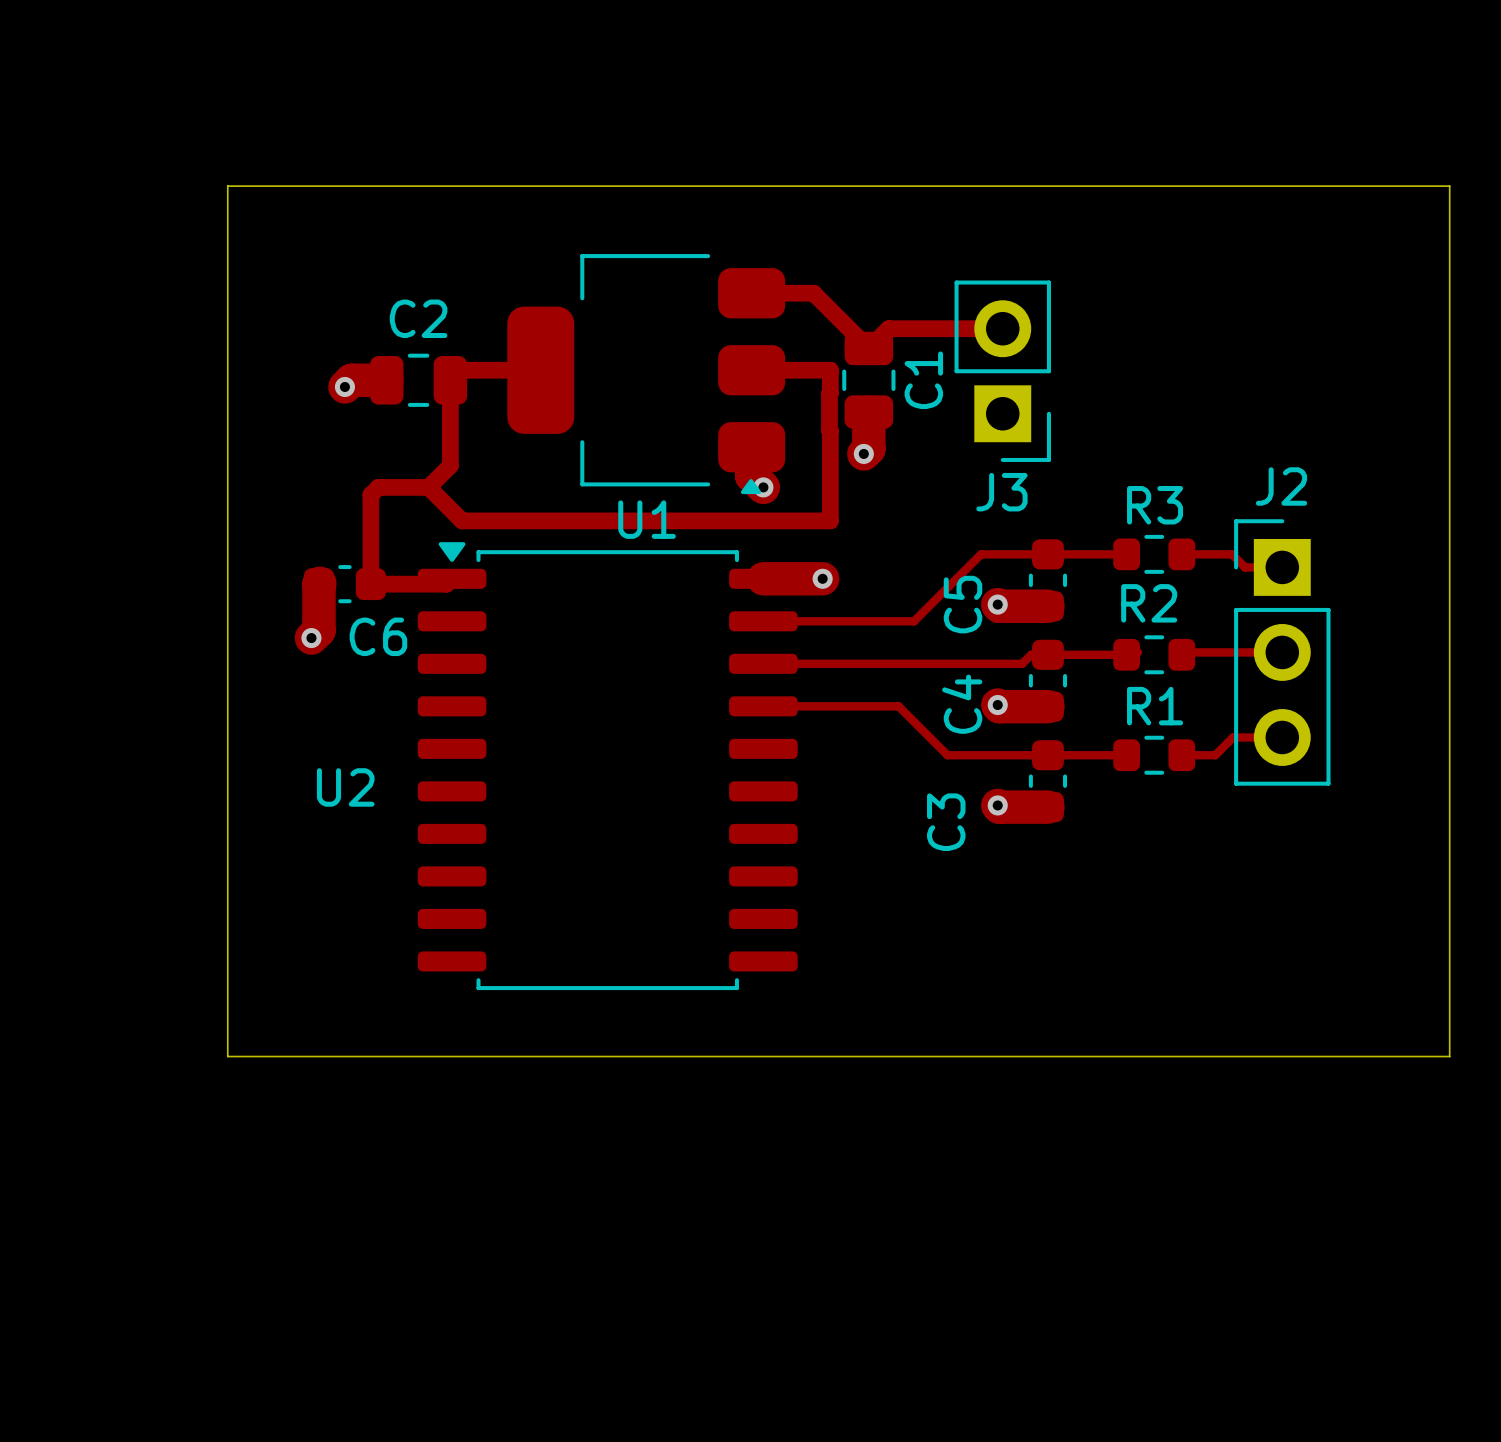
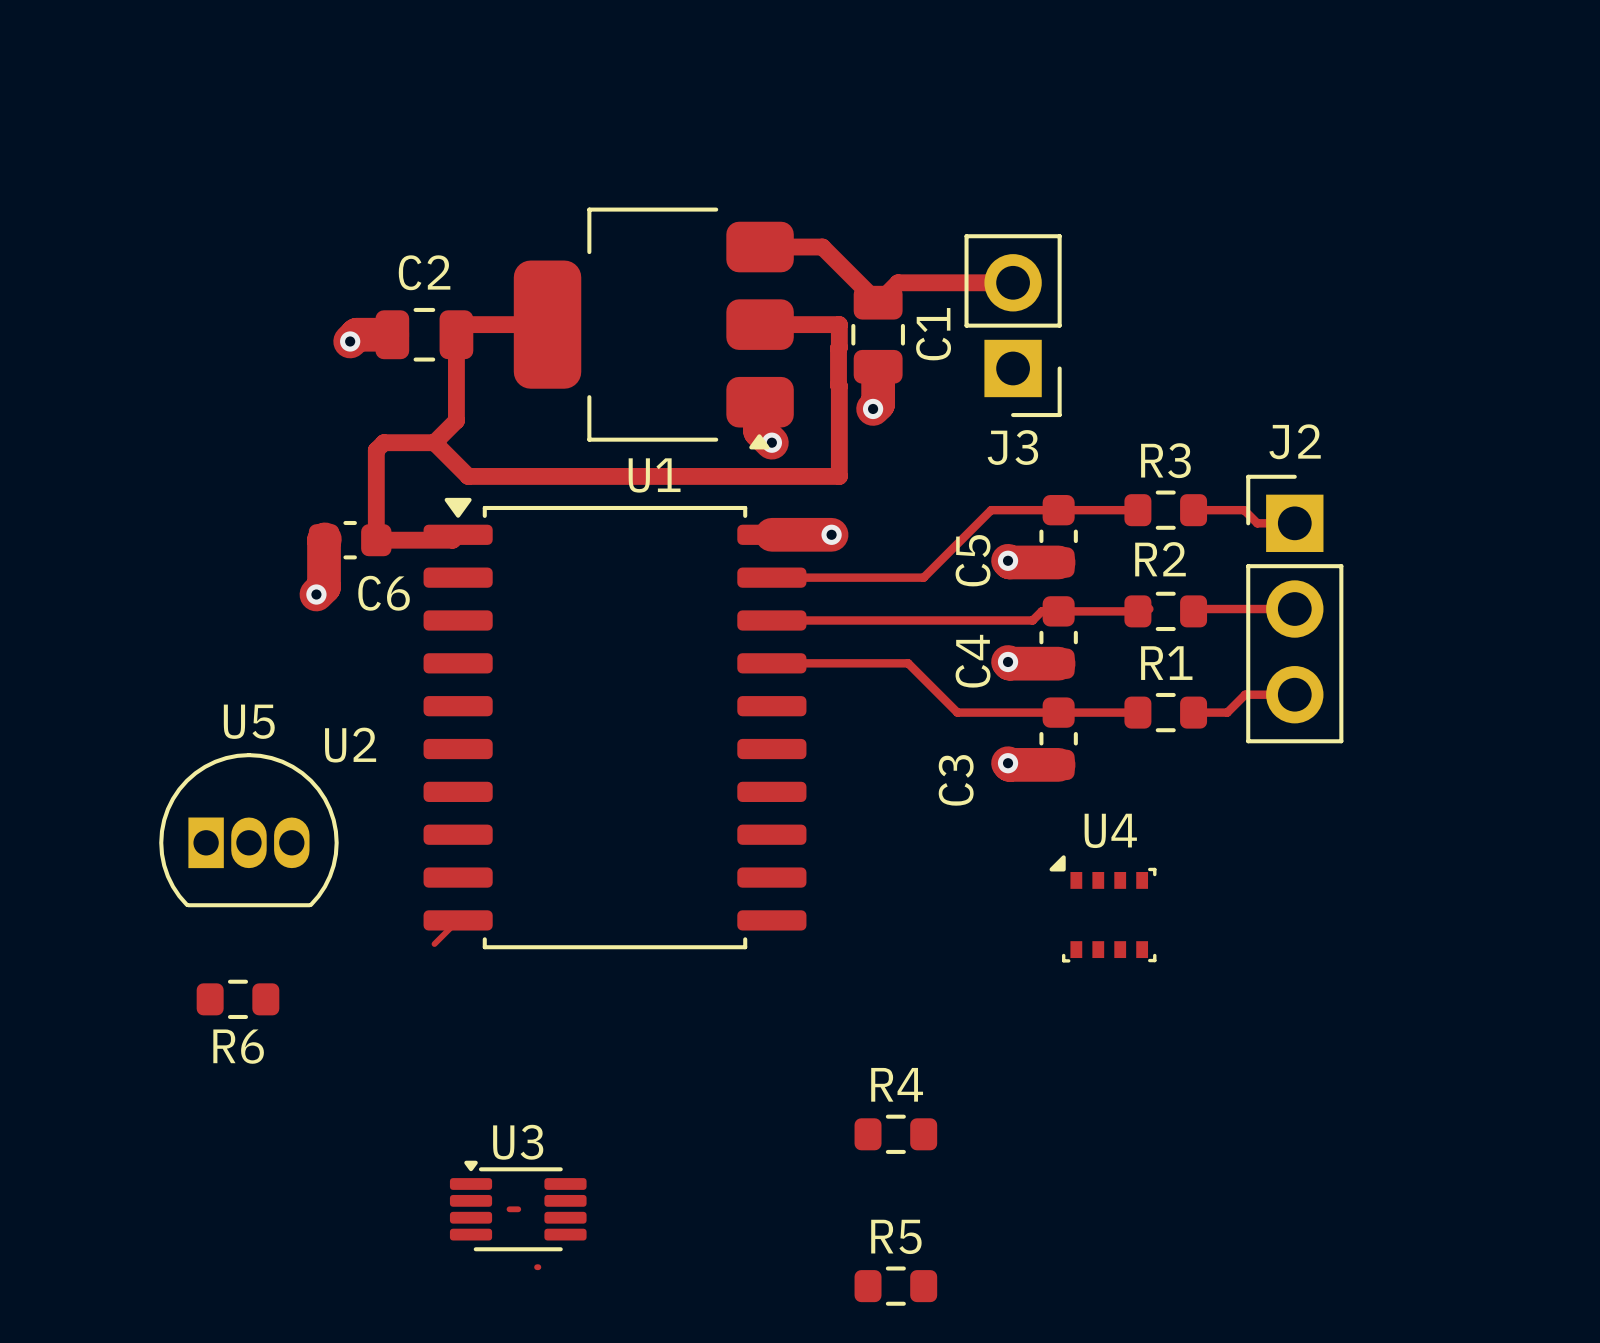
board edge: (227, 186) (1449, 186) (1449, 1056) (227, 1056) (227, 186) -> none
U5: none -> (248, 830)
U4: none -> (1103, 908)
track: none -> (458, 920) (434, 944)
R6: none -> (237, 999)
R4: none -> (895, 1134)
U3: none -> (518, 1206)
track: none -> (509, 1209) (518, 1209)
track: none -> (537, 1267) (538, 1267)
R5: none -> (895, 1286)

